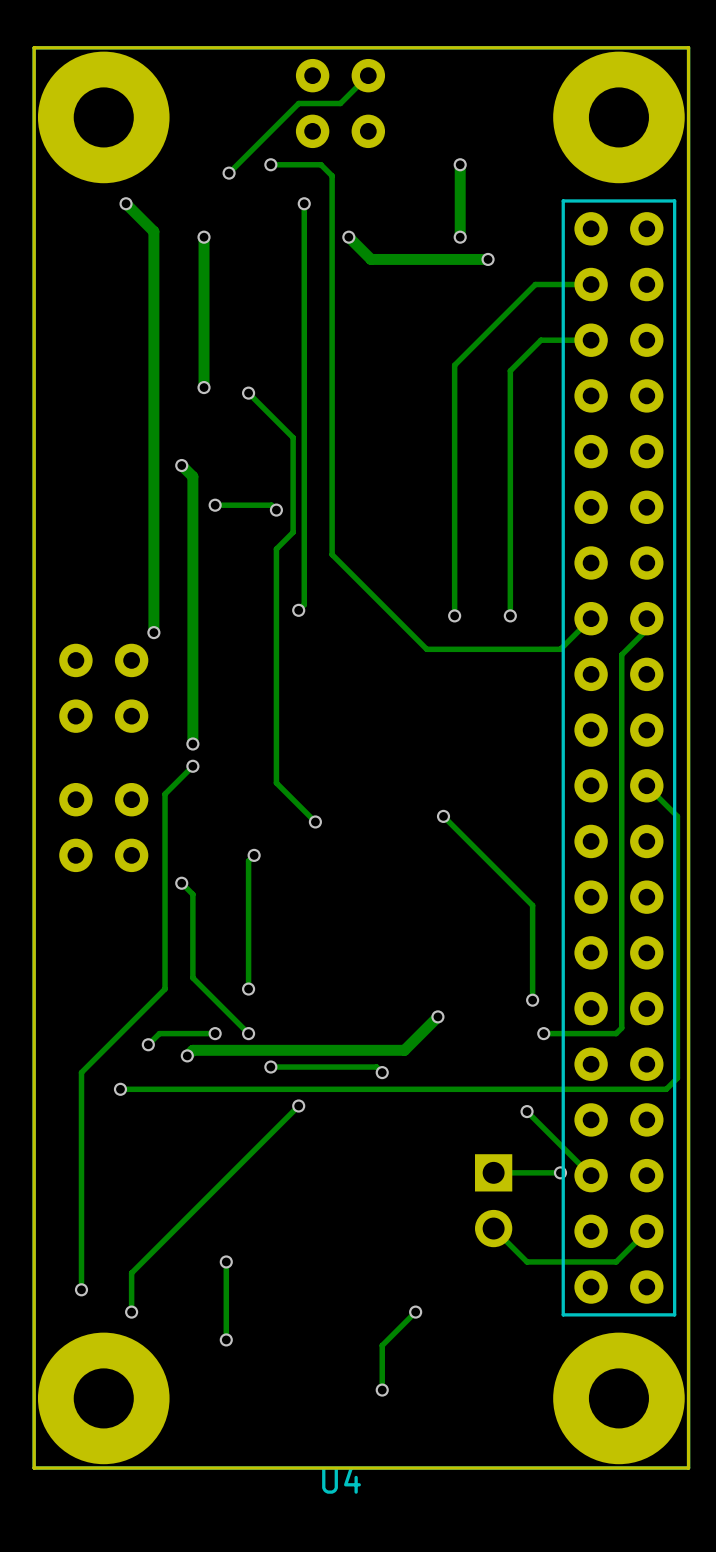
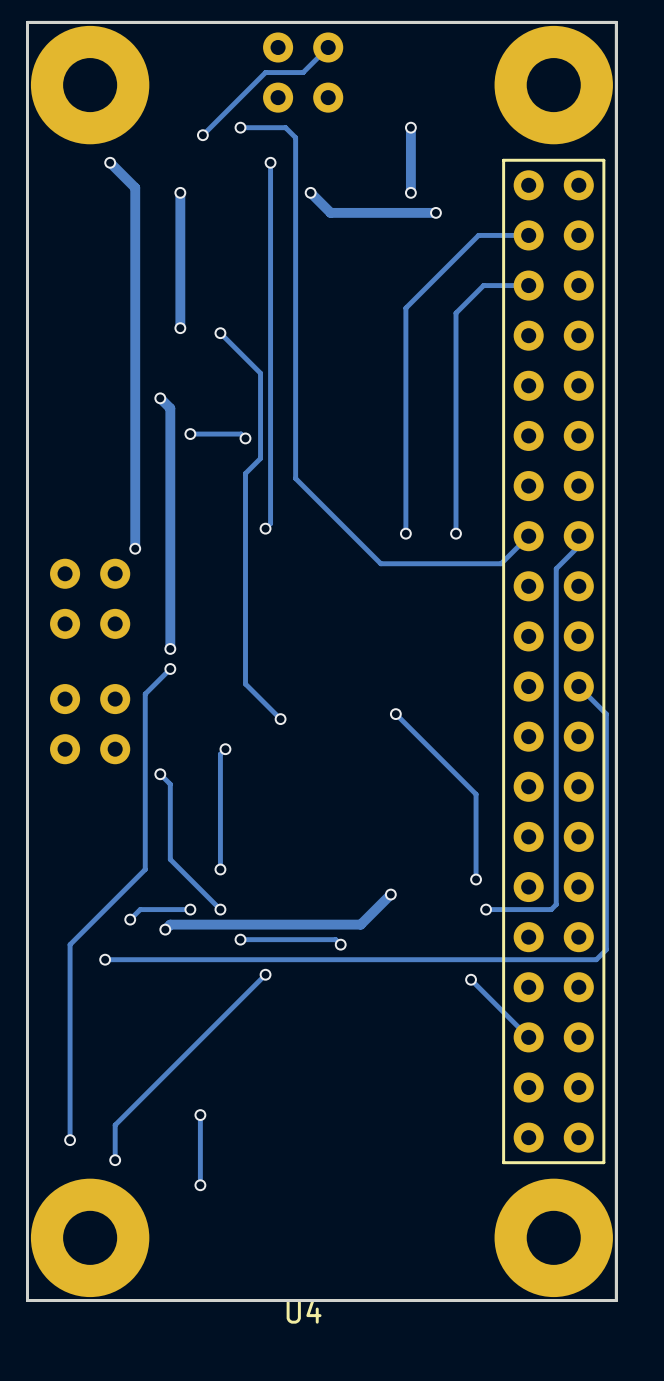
track: (560, 1172) (493, 1172) -> none
via: (560, 1172) -> none
part: (493, 1200) -> none
track: (493, 1228) (527, 1261) (616, 1261) (646, 1231) -> none
track: (415, 1312) (382, 1345) (382, 1390) -> none
via: (415, 1312) -> none
via: (382, 1390) -> none

